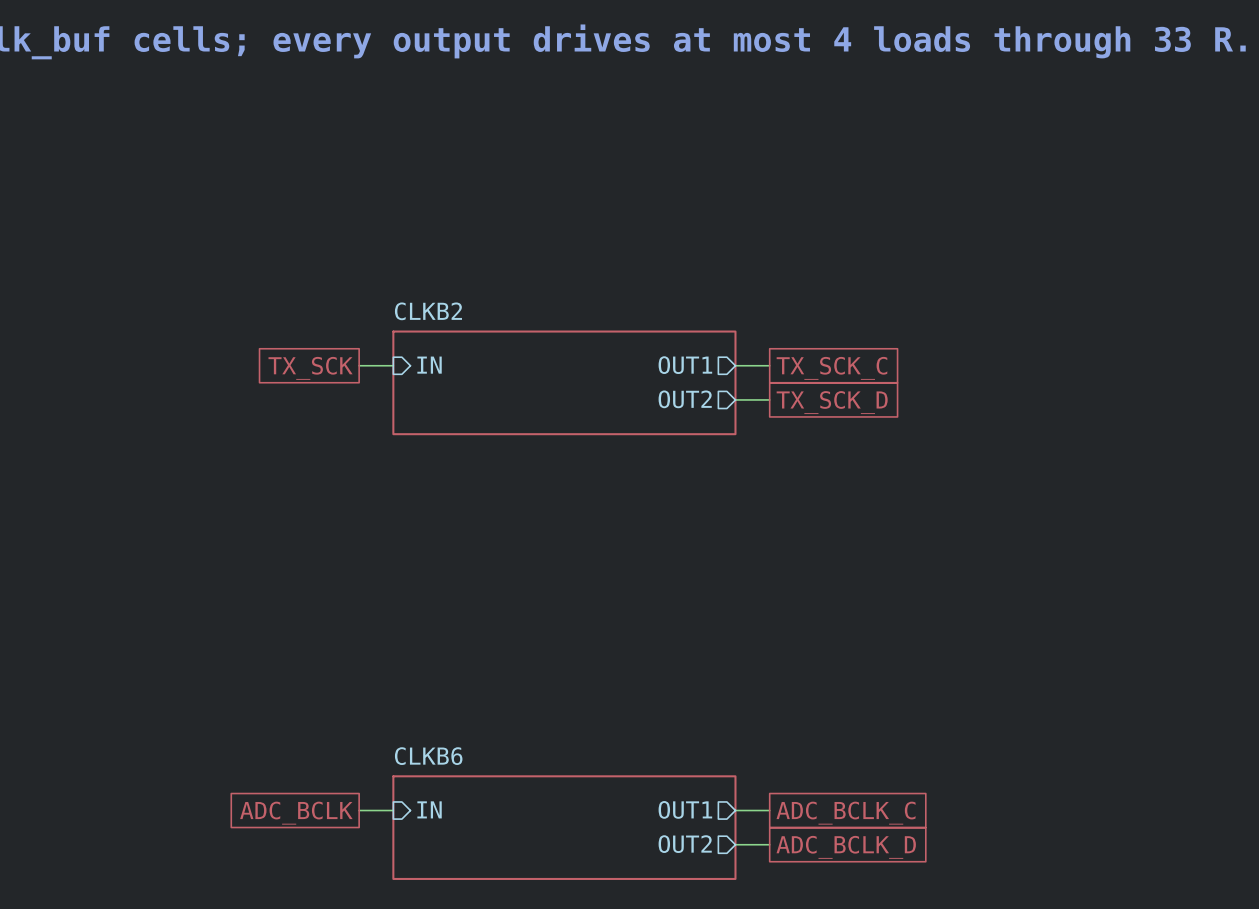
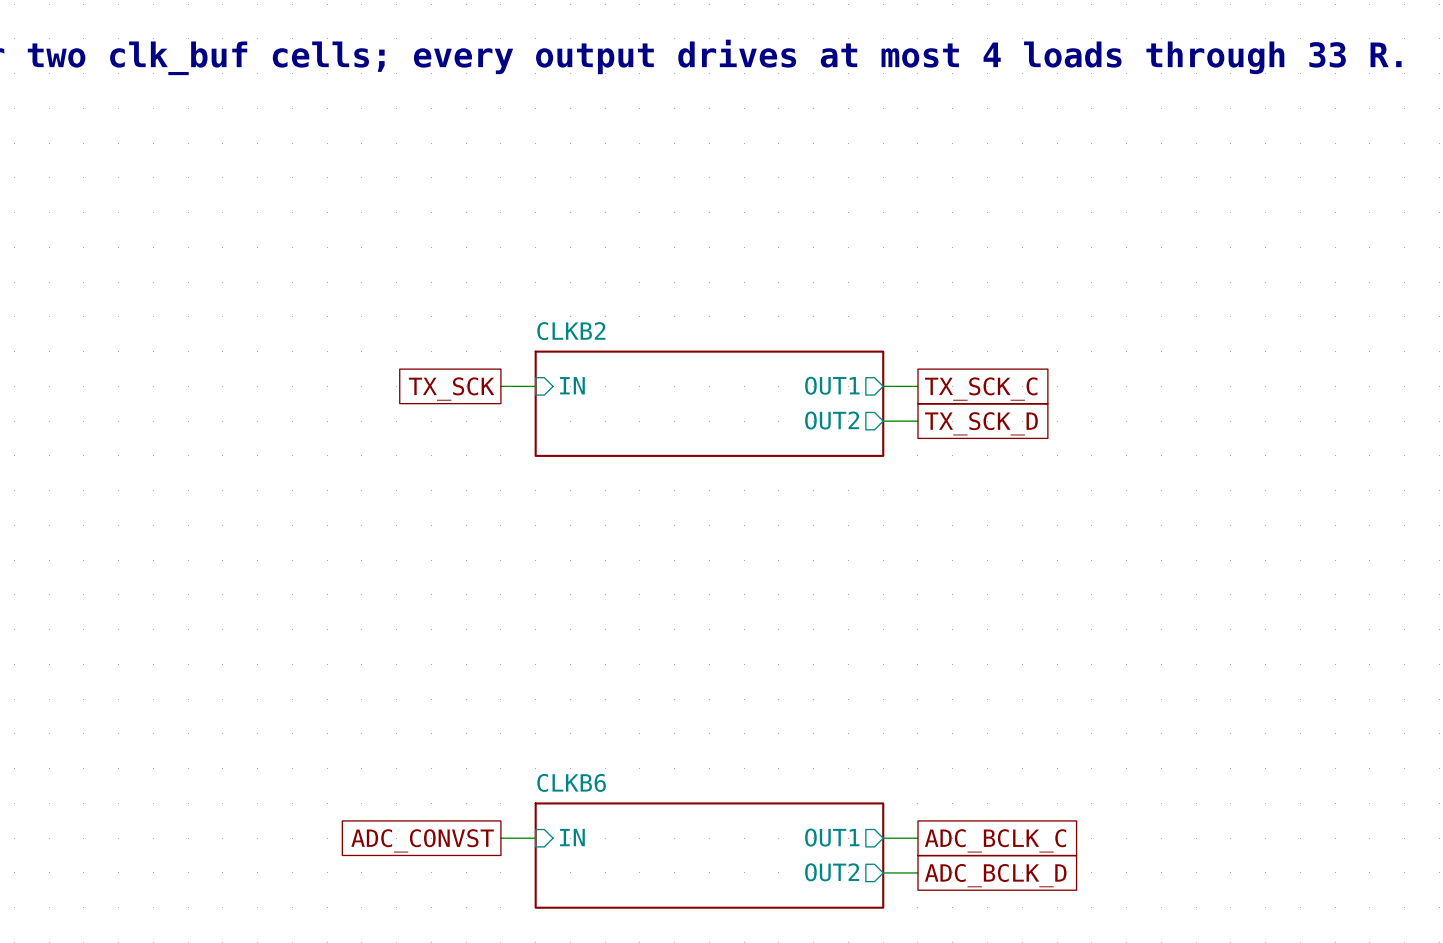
global label: ADC_BCLK (296, 813) -> ADC_CONVST (422, 840)

